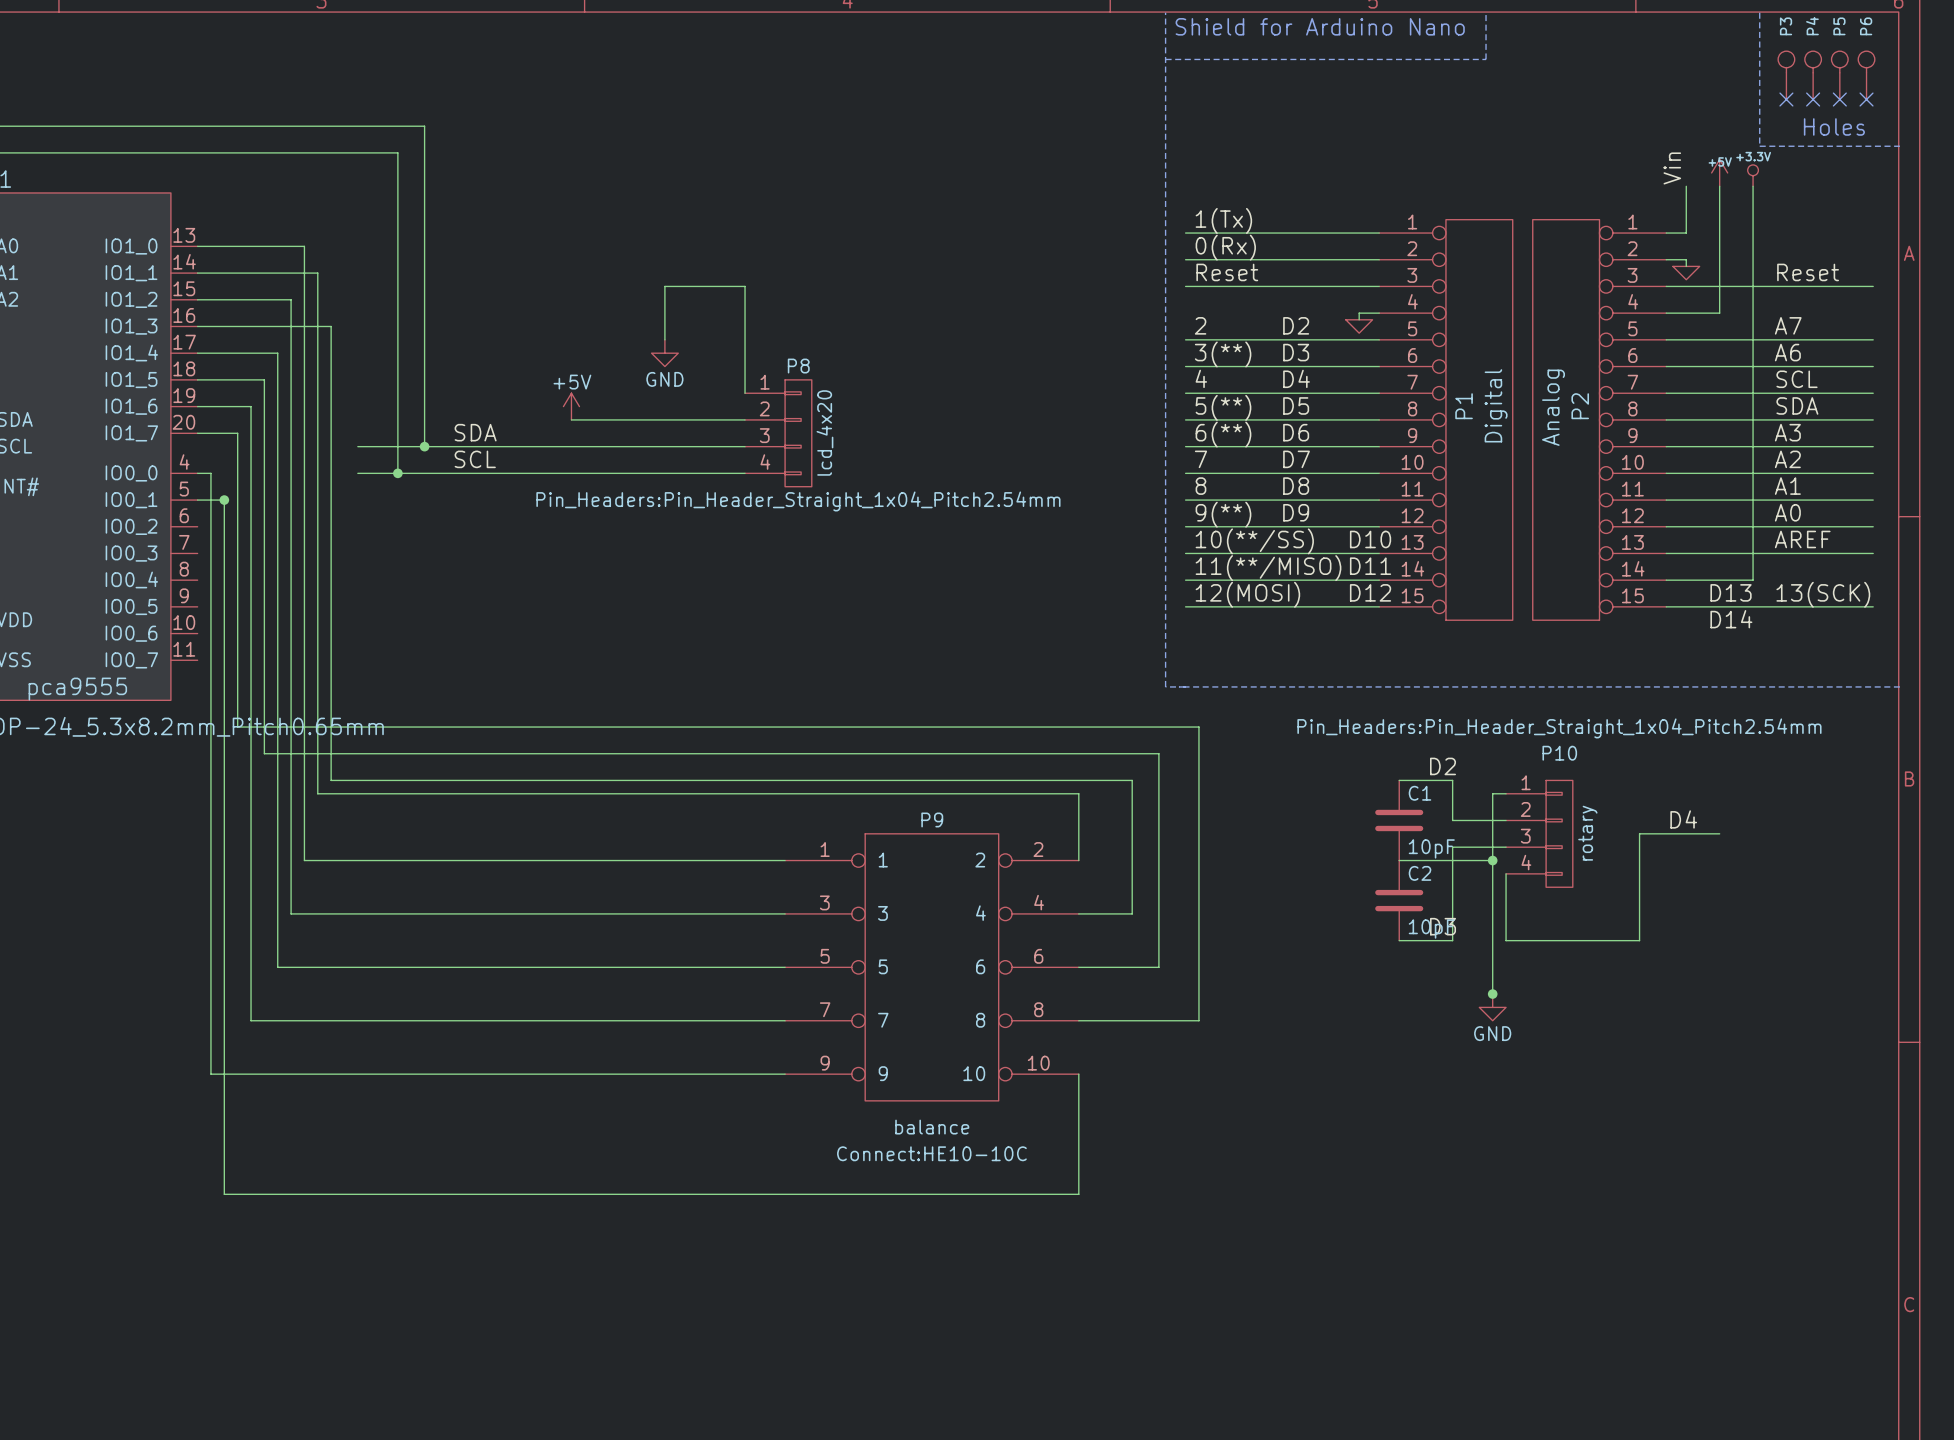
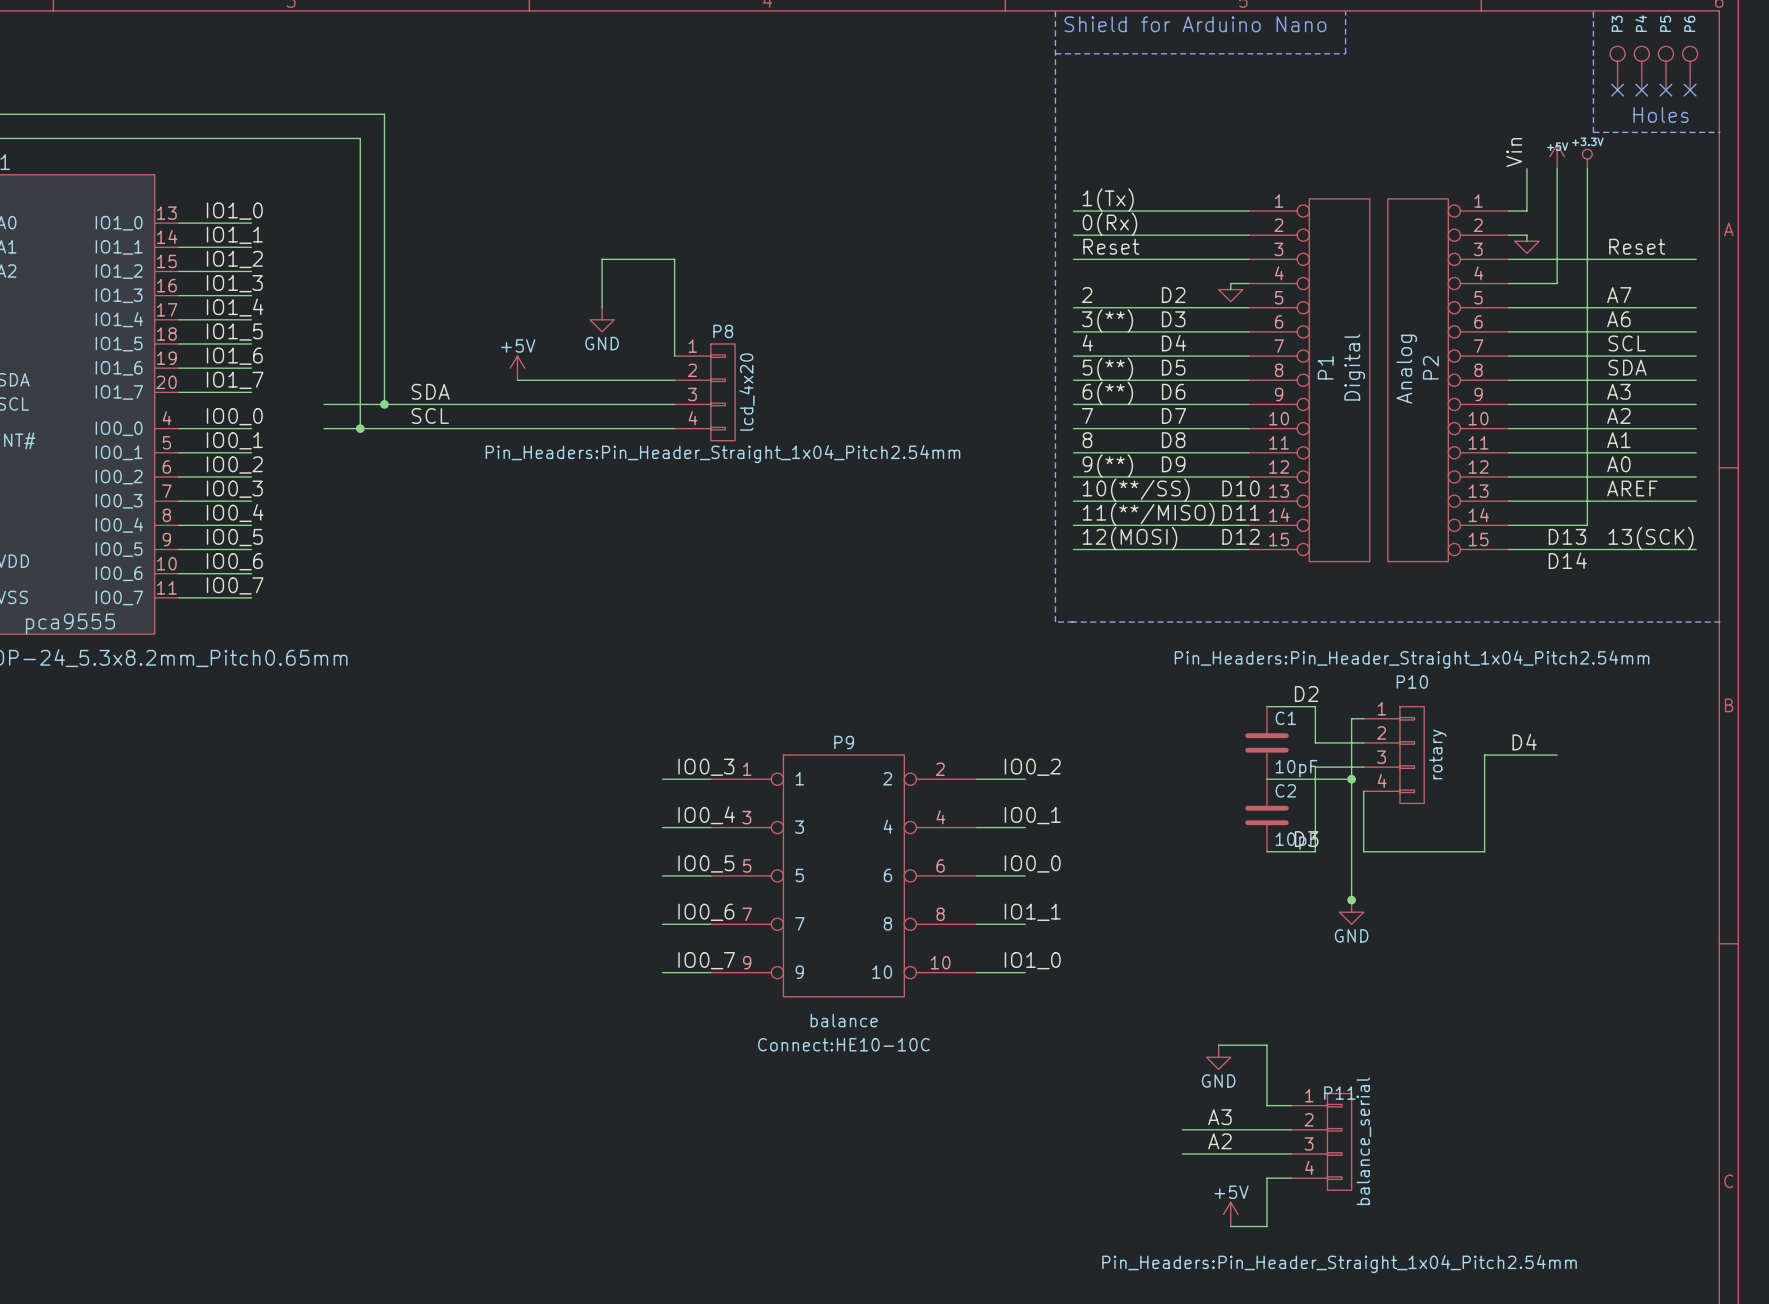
label: none -> IO1_0 (234, 211)
wire: (277, 246) (304, 246) (304, 860) (731, 860) -> none
label: none -> IO1_1 (234, 235)
wire: (277, 273) (317, 273) (317, 793) (1078, 793) (1078, 860) -> (1025, 779) (976, 779)
label: none -> IO1_2 (234, 259)
wire: (277, 299) (291, 299) (291, 913) (731, 913) -> none
label: none -> IO1_3 (234, 283)
wire: (277, 326) (331, 326) (331, 780) (1132, 780) (1132, 913) -> none
label: none -> IO1_4 (235, 307)
wire: (277, 353) (277, 967) (731, 967) -> none
label: none -> IO1_5 (234, 332)
wire: (264, 379) (264, 753) (1158, 753) (1158, 967) (1132, 967) -> (239, 343) (251, 343)
label: none -> IO1_6 (234, 356)
wire: (251, 406) (251, 1020) (731, 1020) -> (227, 368) (251, 368)
label: none -> IO1_7 (235, 380)
wire: (237, 433) (237, 727) (1198, 727) (1198, 1020) (1132, 1020) -> (215, 392) (251, 392)
label: none -> IO0_0 (234, 416)
wire: (210, 473) (210, 1074) (731, 1074) -> (191, 428) (251, 428)
label: none -> IO0_1 (234, 440)
wire: (224, 500) (224, 1194) (1078, 1194) (1078, 1074) -> (203, 452) (251, 452)
junction: (224, 500) -> none
label: none -> IO0_2 (234, 465)
wire: none -> (178, 476) (251, 476)
label: none -> IO0_3 (234, 489)
wire: none -> (178, 501) (251, 501)
label: none -> IO0_4 (235, 513)
wire: none -> (178, 525) (251, 525)
label: none -> IO0_5 (234, 537)
wire: none -> (178, 549) (251, 549)
label: none -> IO0_6 (234, 561)
wire: none -> (178, 573) (251, 573)
label: none -> IO0_7 (235, 585)
wire: none -> (178, 597) (251, 597)
label: none -> IO0_3 (706, 767)
label: none -> IO0_2 (1032, 767)
label: none -> IO0_4 (706, 815)
label: none -> IO0_1 (1032, 815)
label: none -> IO0_5 (706, 863)
label: none -> IO0_0 (1032, 863)
label: none -> IO0_6 (706, 912)
label: none -> IO1_1 (1032, 912)
label: none -> IO0_7 (706, 960)
label: none -> IO1_0 (1032, 960)
wire: none -> (976, 972) (1025, 972)
wire: none -> (1218, 1045) (1267, 1045) (1267, 1105) (1291, 1105)
power symbol: none -> GND (1218, 1057)
label: none -> A3 (1219, 1117)
wire: none -> (1182, 1129) (1291, 1129)
label: none -> A2 (1219, 1141)
P11: none -> balance_serial (1321, 1141)
wire: none -> (1182, 1153) (1291, 1153)
wire: none -> (1291, 1178) (1267, 1178) (1267, 1226) (1230, 1226)
power symbol: none -> +5V (1230, 1214)

